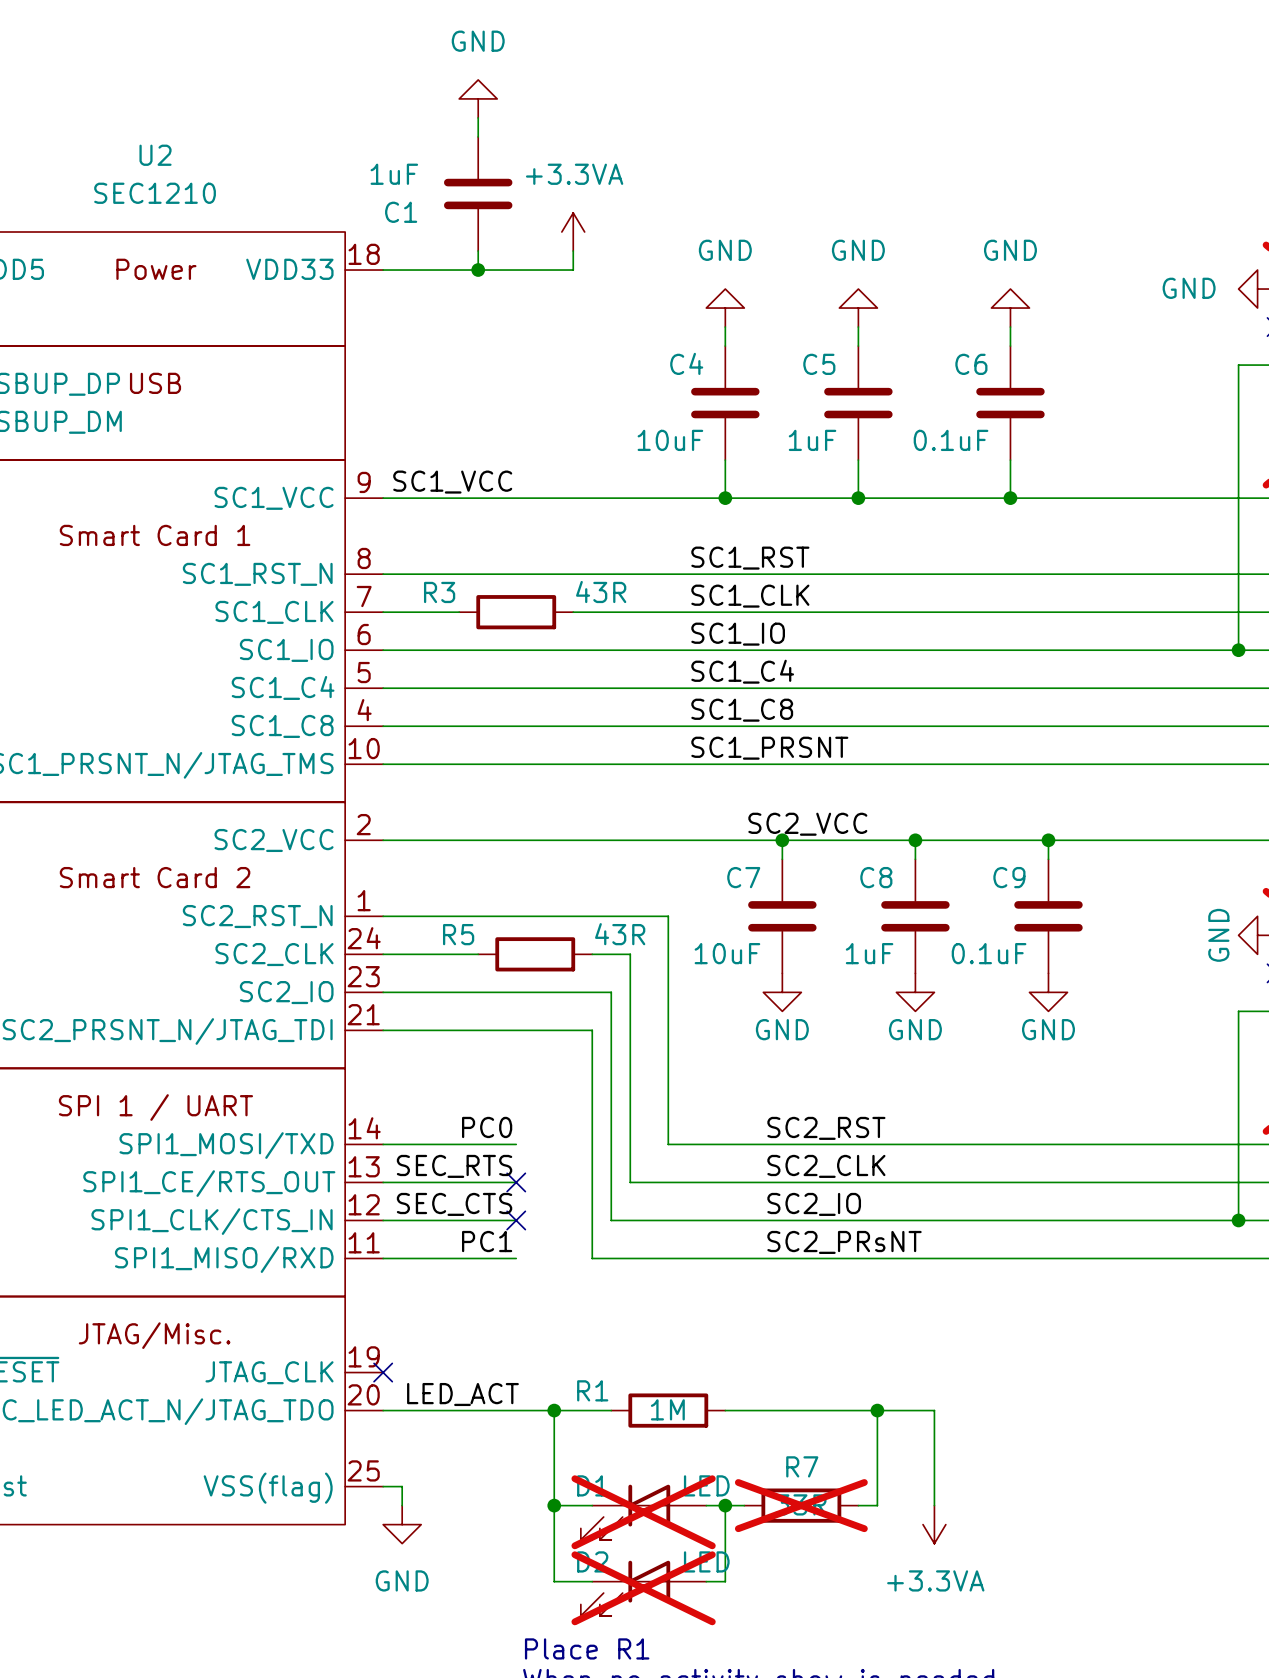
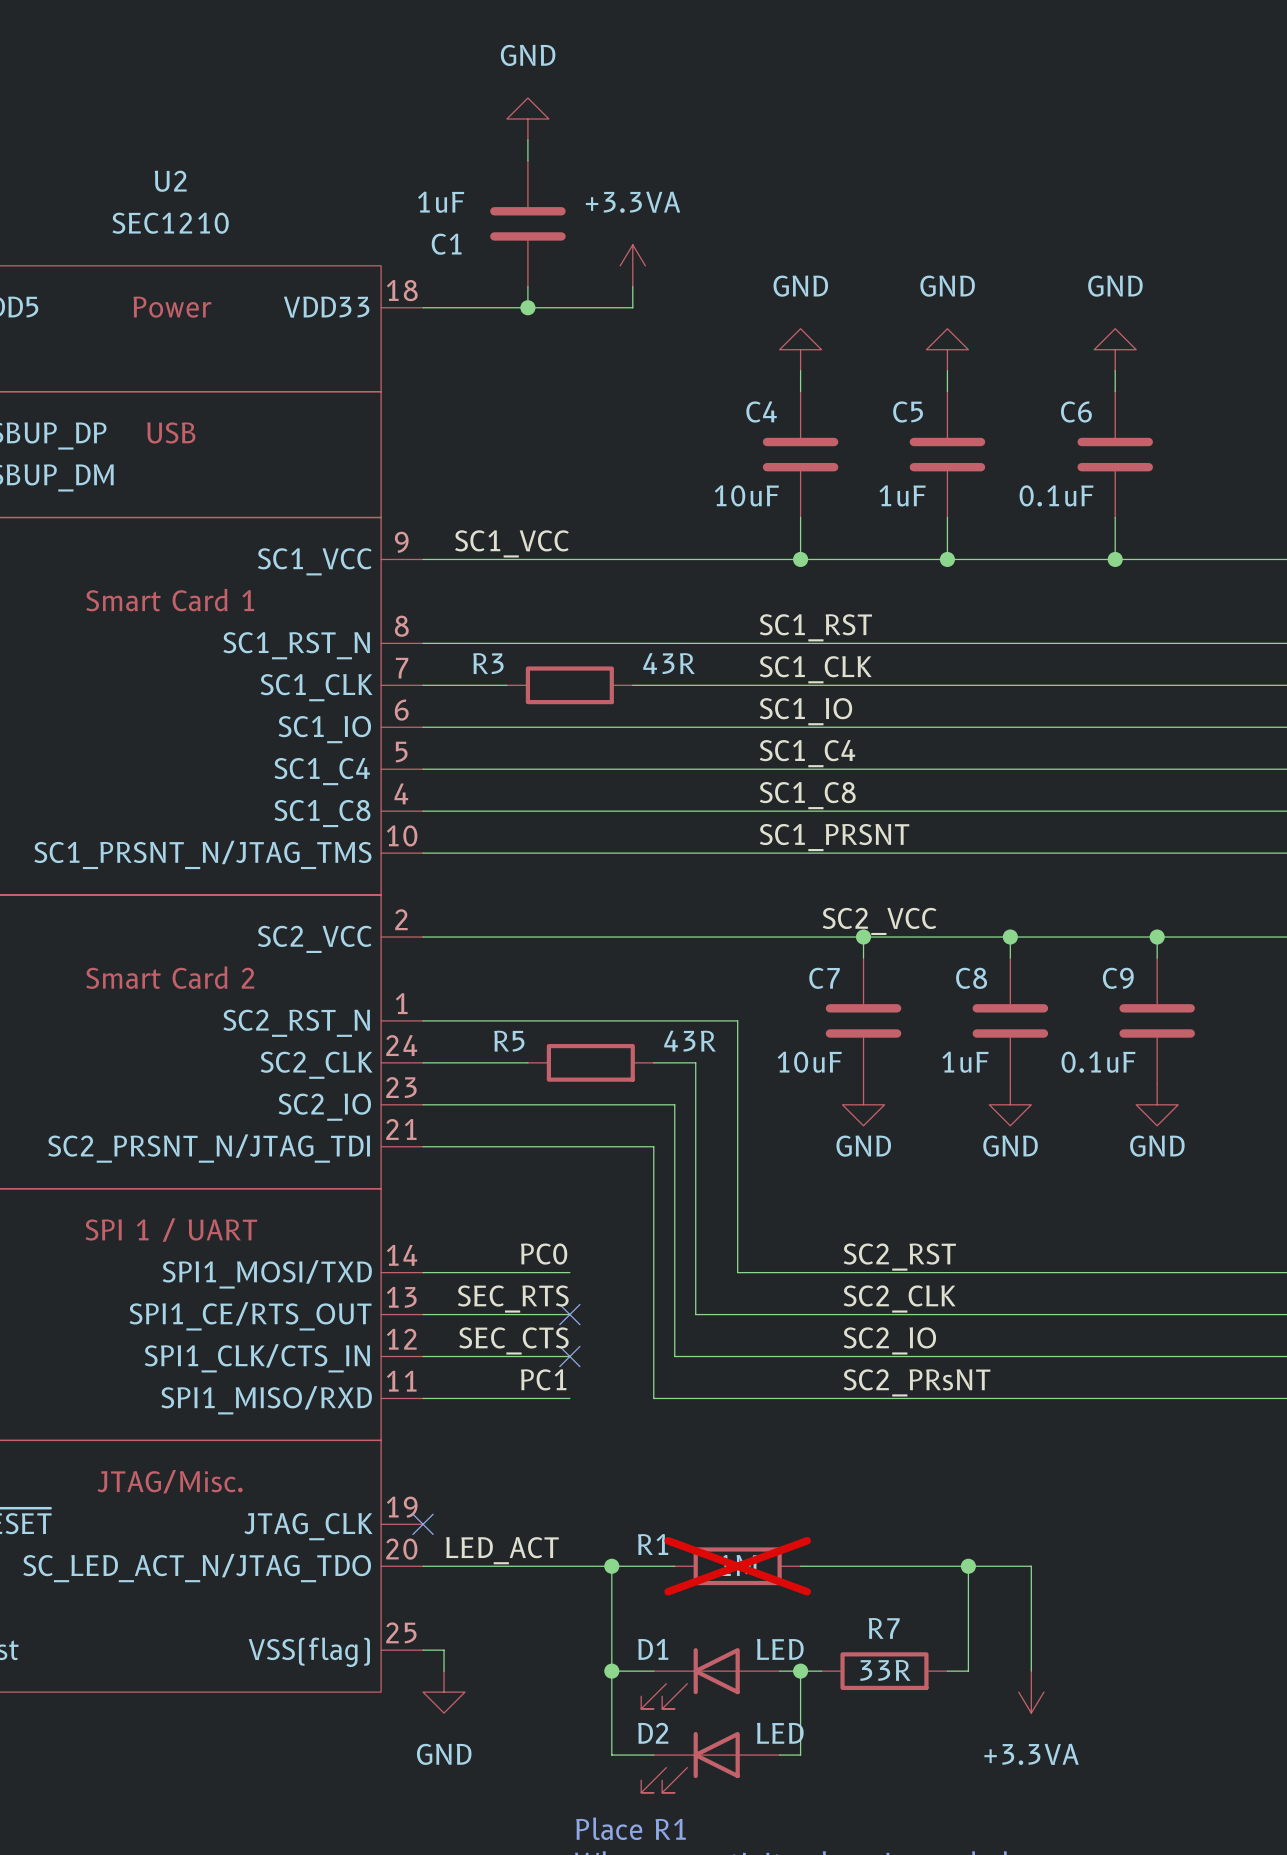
R1 do-not-place cross: none -> (737, 1566)
R7 do-not-place cross: (801, 1505) -> none
D1 do-not-place cross: (643, 1512) -> none
D2 do-not-place cross: (643, 1588) -> none

